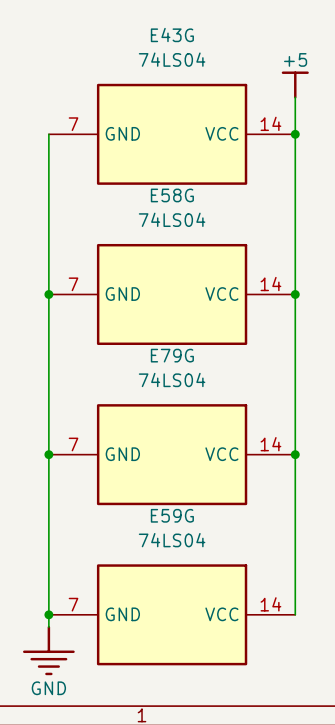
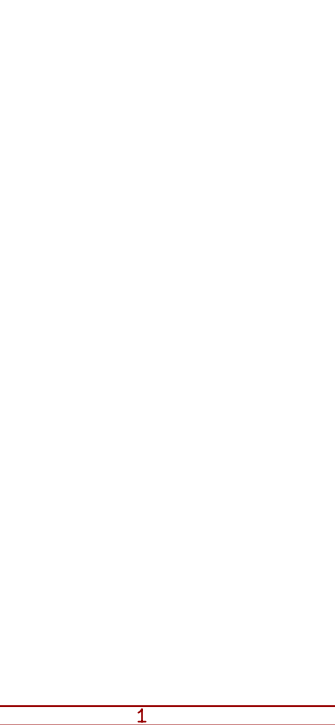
power symbol: +5 (295, 85) -> none
wire: (295, 97) (295, 614) -> none
wire: (48, 134) (48, 627) -> none
E43G: 74LS04 (172, 134) -> none
junction: (295, 134) -> none
junction: (48, 294) -> none
E58G: 74LS04 (172, 294) -> none
junction: (295, 294) -> none
junction: (48, 454) -> none
E79G: 74LS04 (172, 454) -> none
junction: (295, 454) -> none
junction: (48, 614) -> none
E59G: 74LS04 (172, 614) -> none
power symbol: GND (48, 650) -> none

